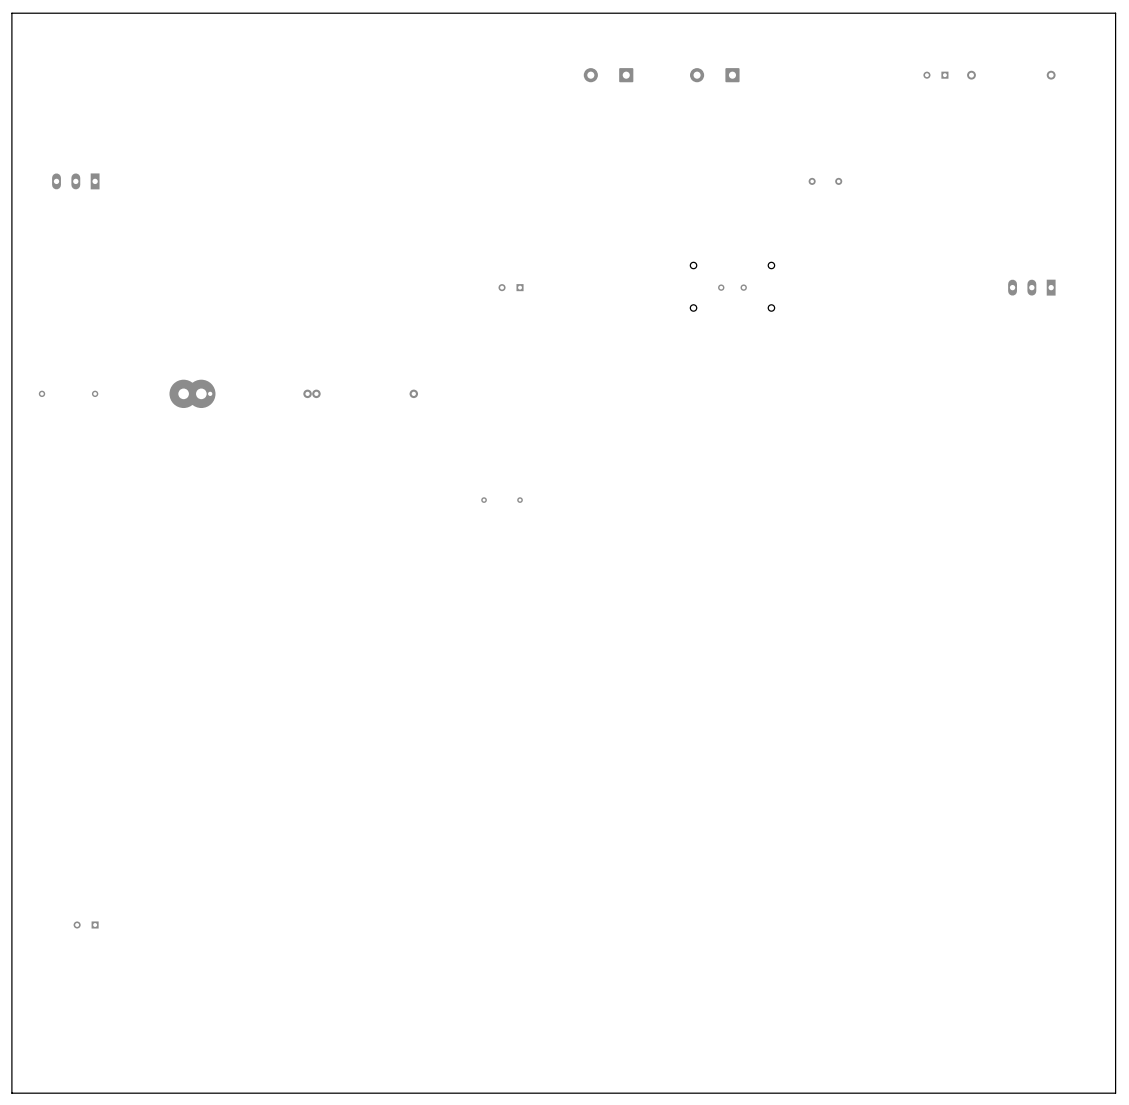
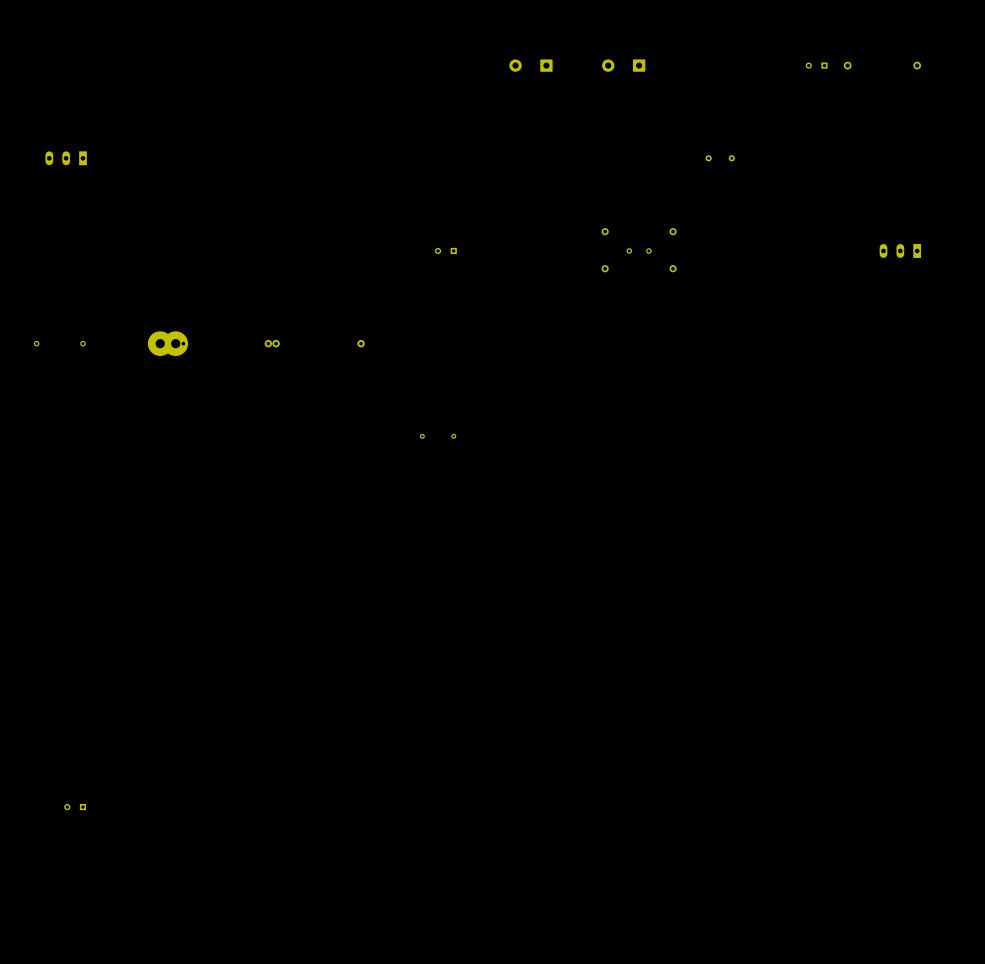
board edge: (1115, 13) (11, 13) (11, 1093) (1115, 1093) (1115, 13) -> none

